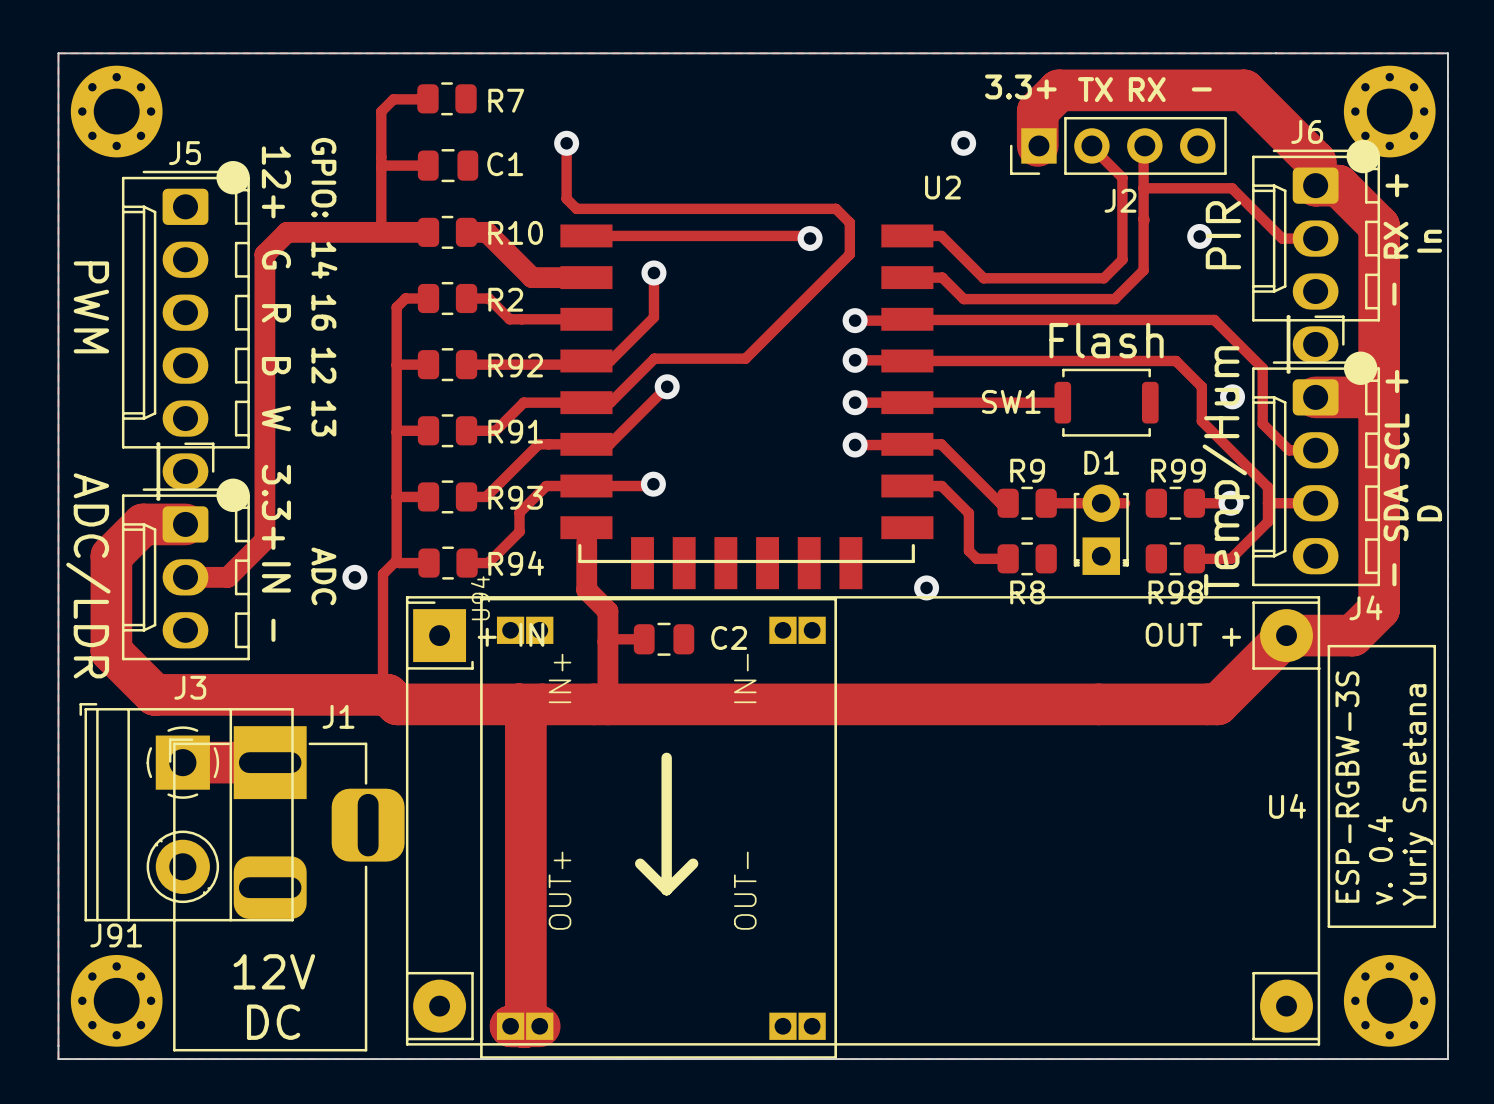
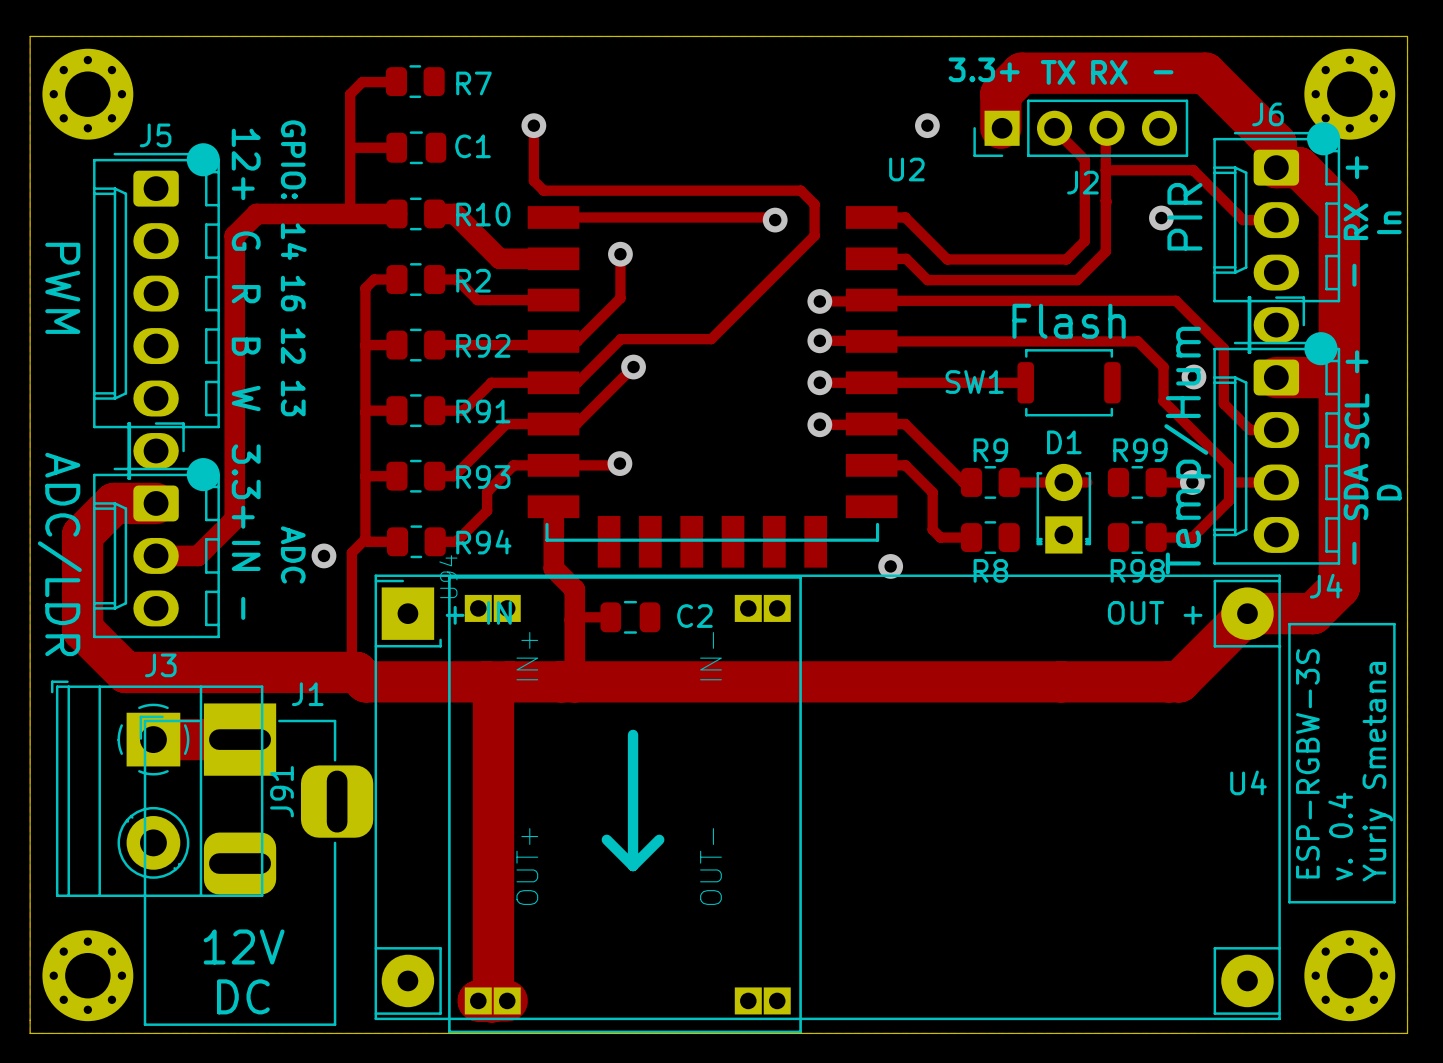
J91 name rotation: 0° (116, 935) -> 90° counterclockwise (281, 791)
J91 name position: J91 (116, 935) -> J91 (281, 791)

